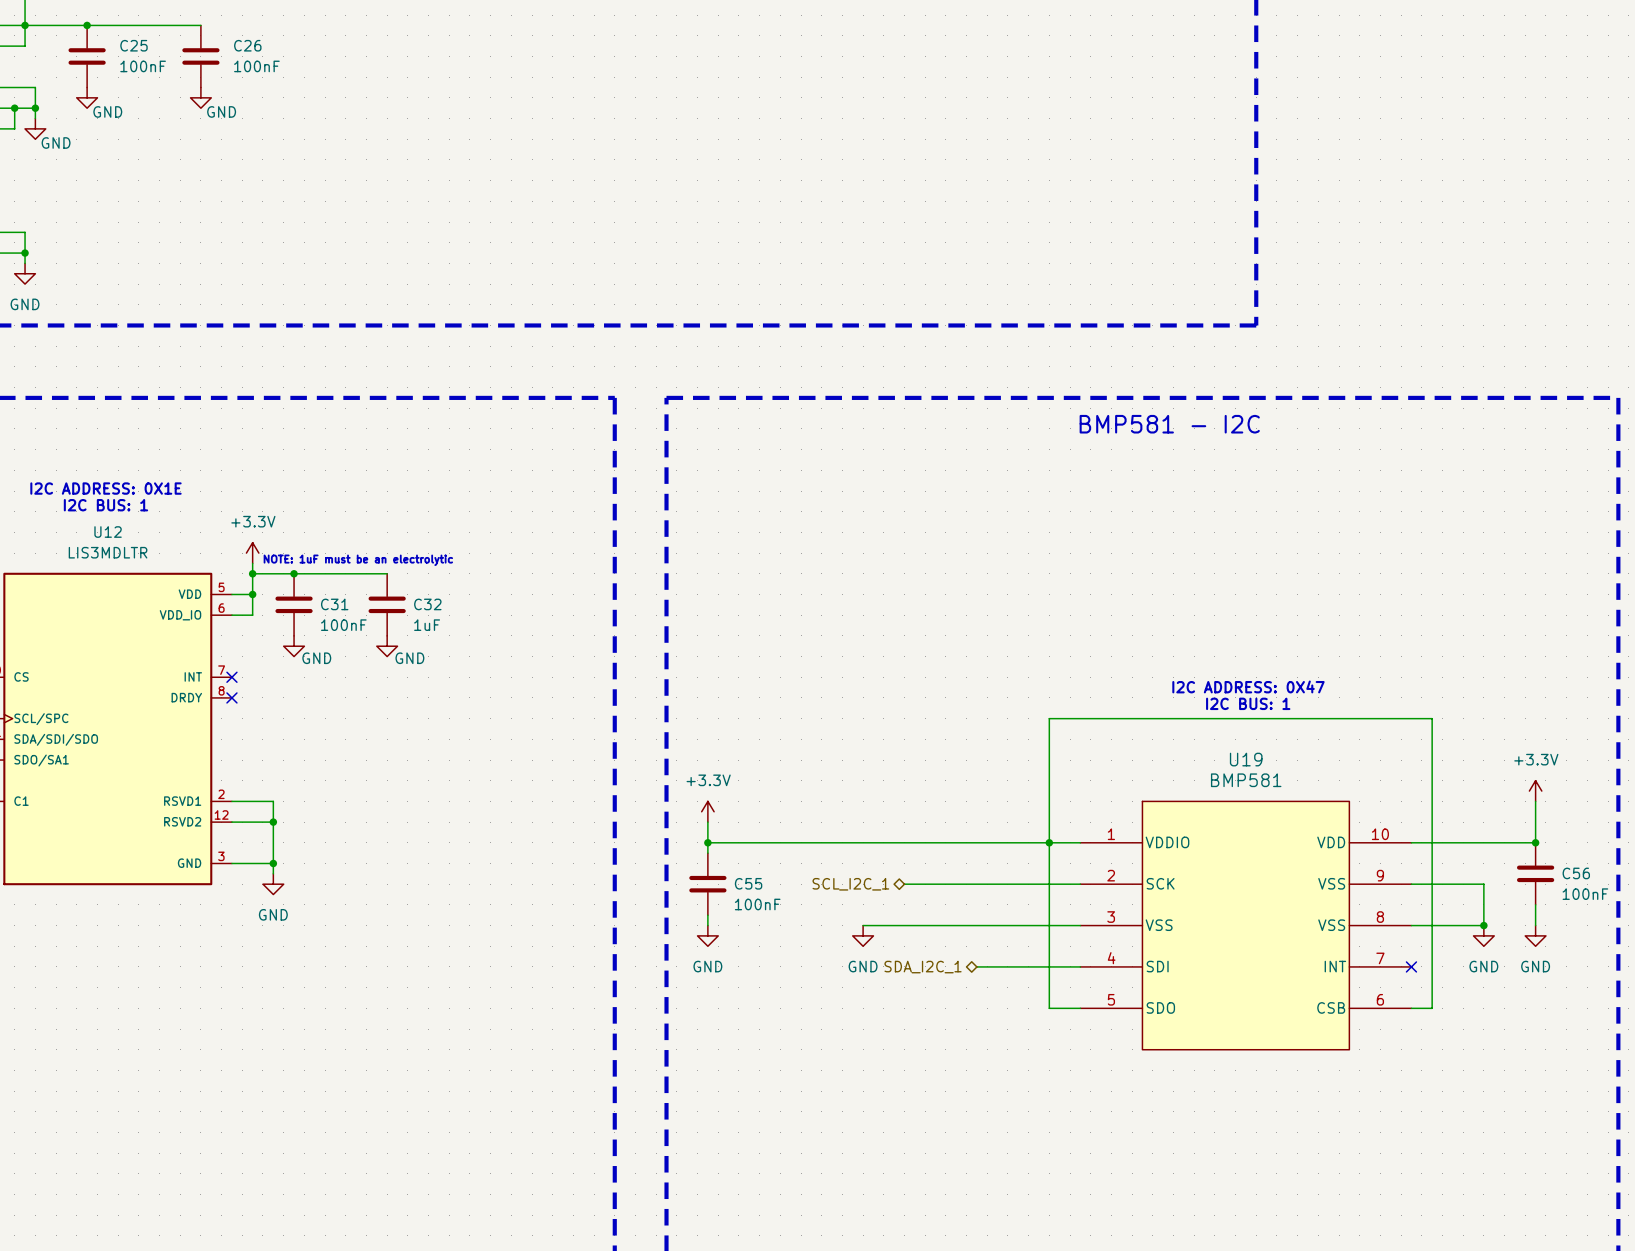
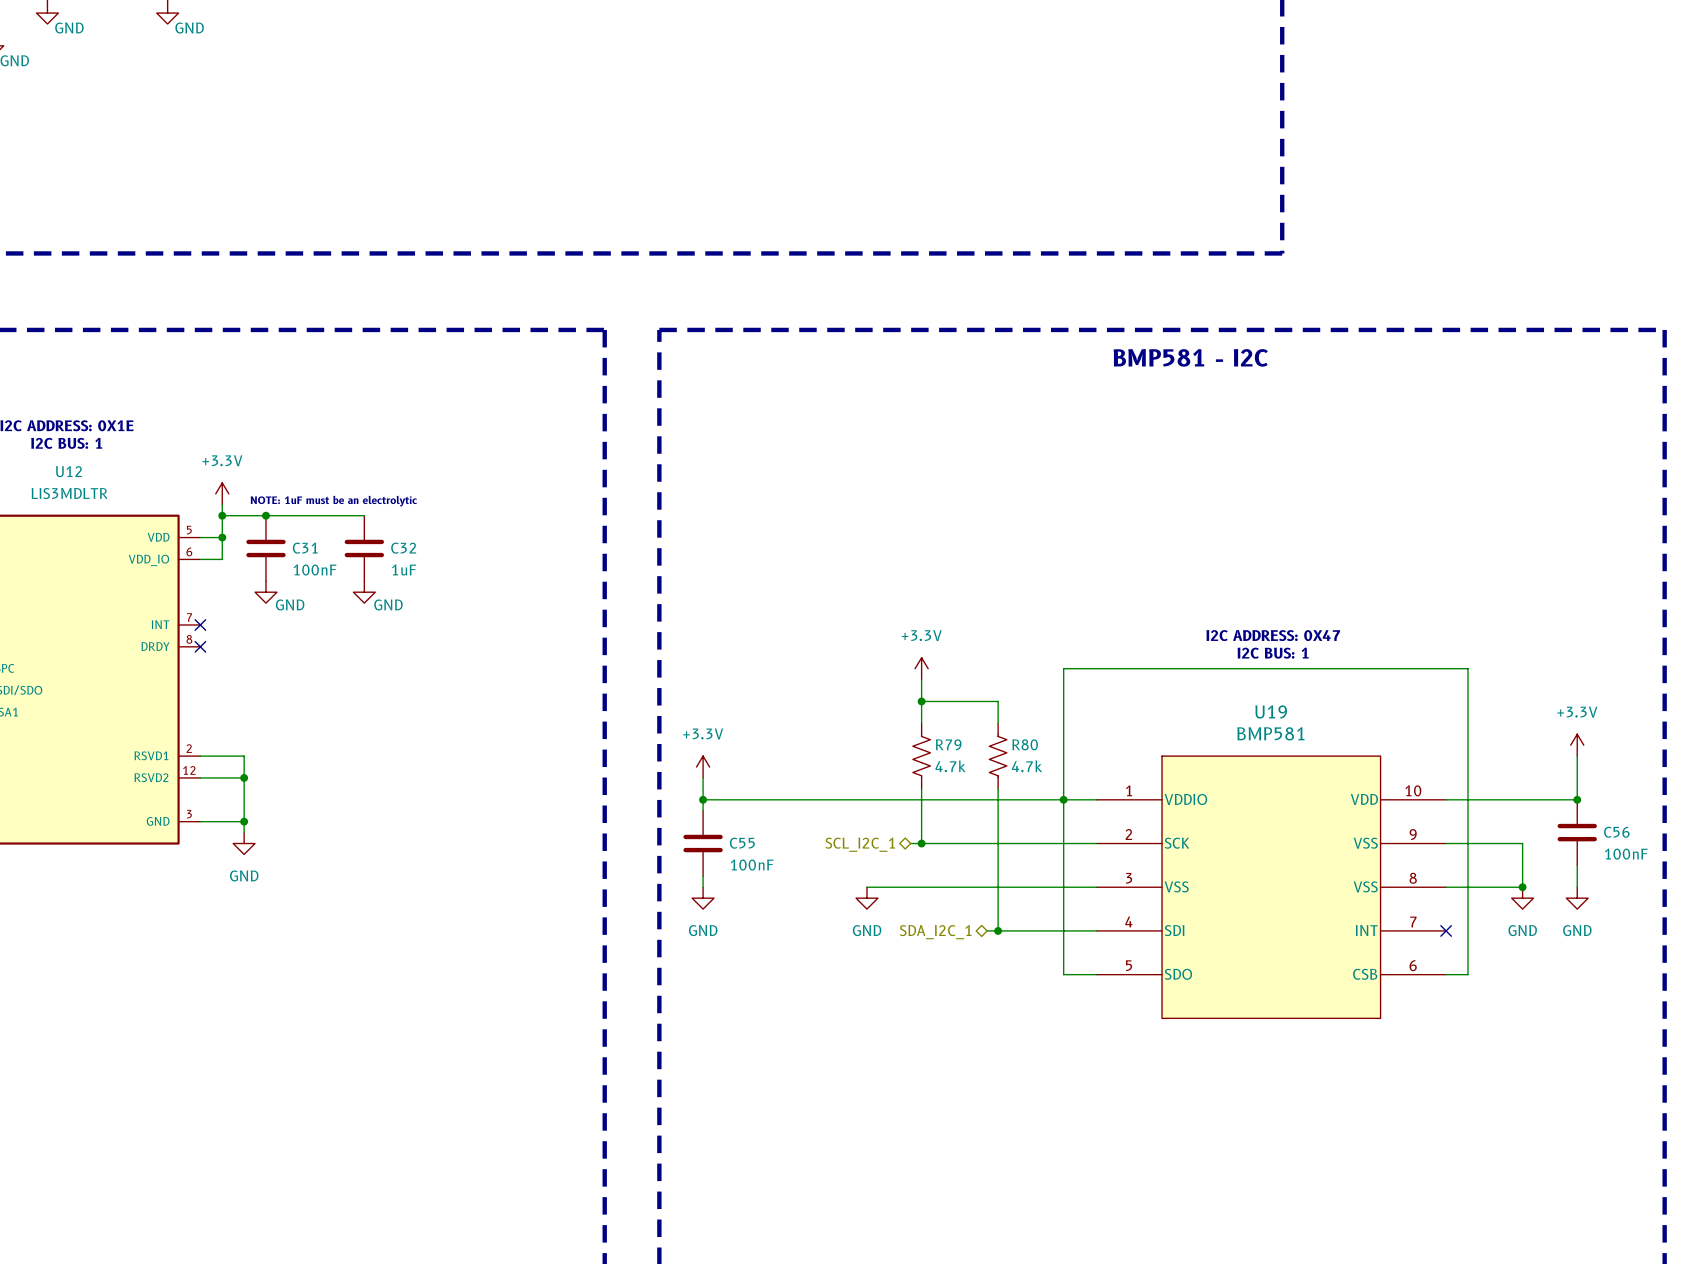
power symbol: none -> +3.3V (921, 668)
wire: none -> (921, 679) (921, 723)
wire: none -> (921, 701) (998, 701) (998, 723)
junction: none -> (921, 701)
R79: none -> 4.7k (921, 756)
R80: none -> 4.7k (998, 756)
wire: none -> (921, 788) (921, 843)
wire: none -> (998, 788) (998, 930)
junction: none -> (921, 843)
junction: none -> (998, 930)

